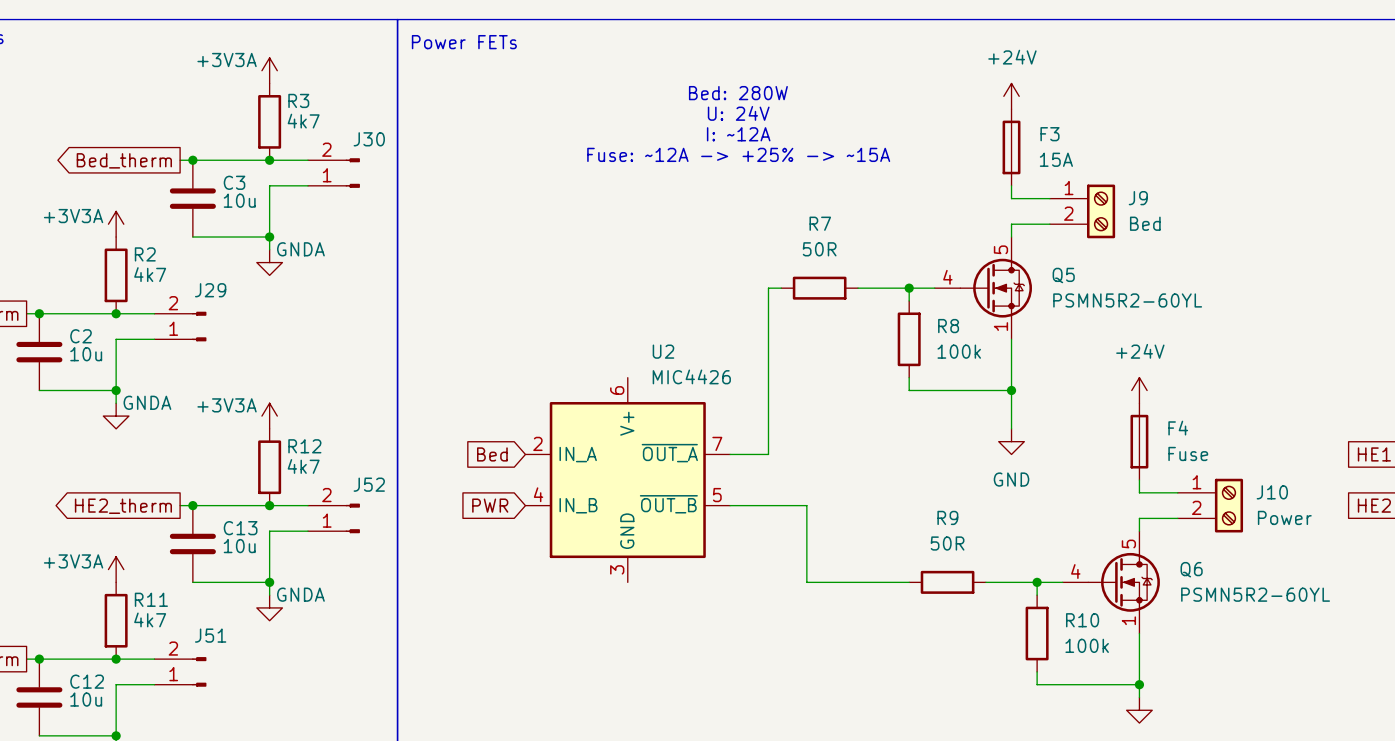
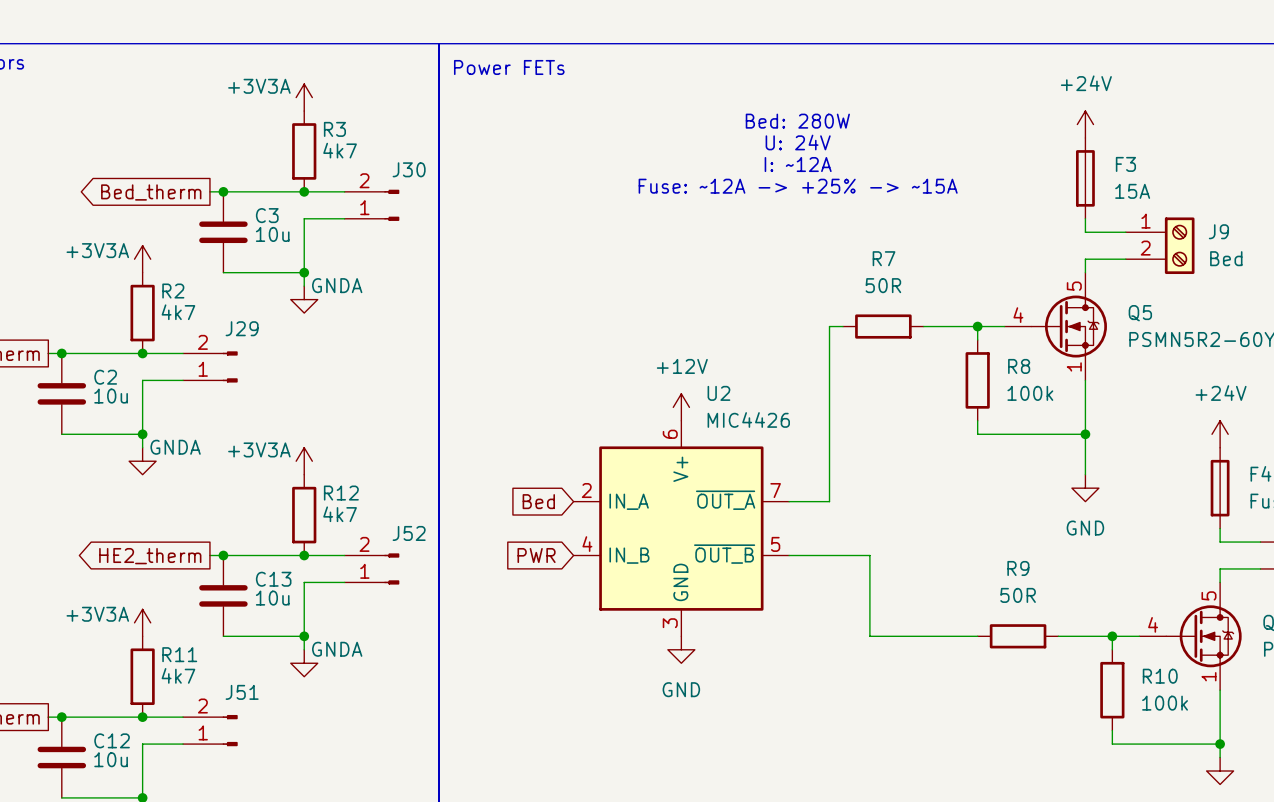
power symbol: none -> +12V (681, 407)
power symbol: none -> GND (681, 649)

